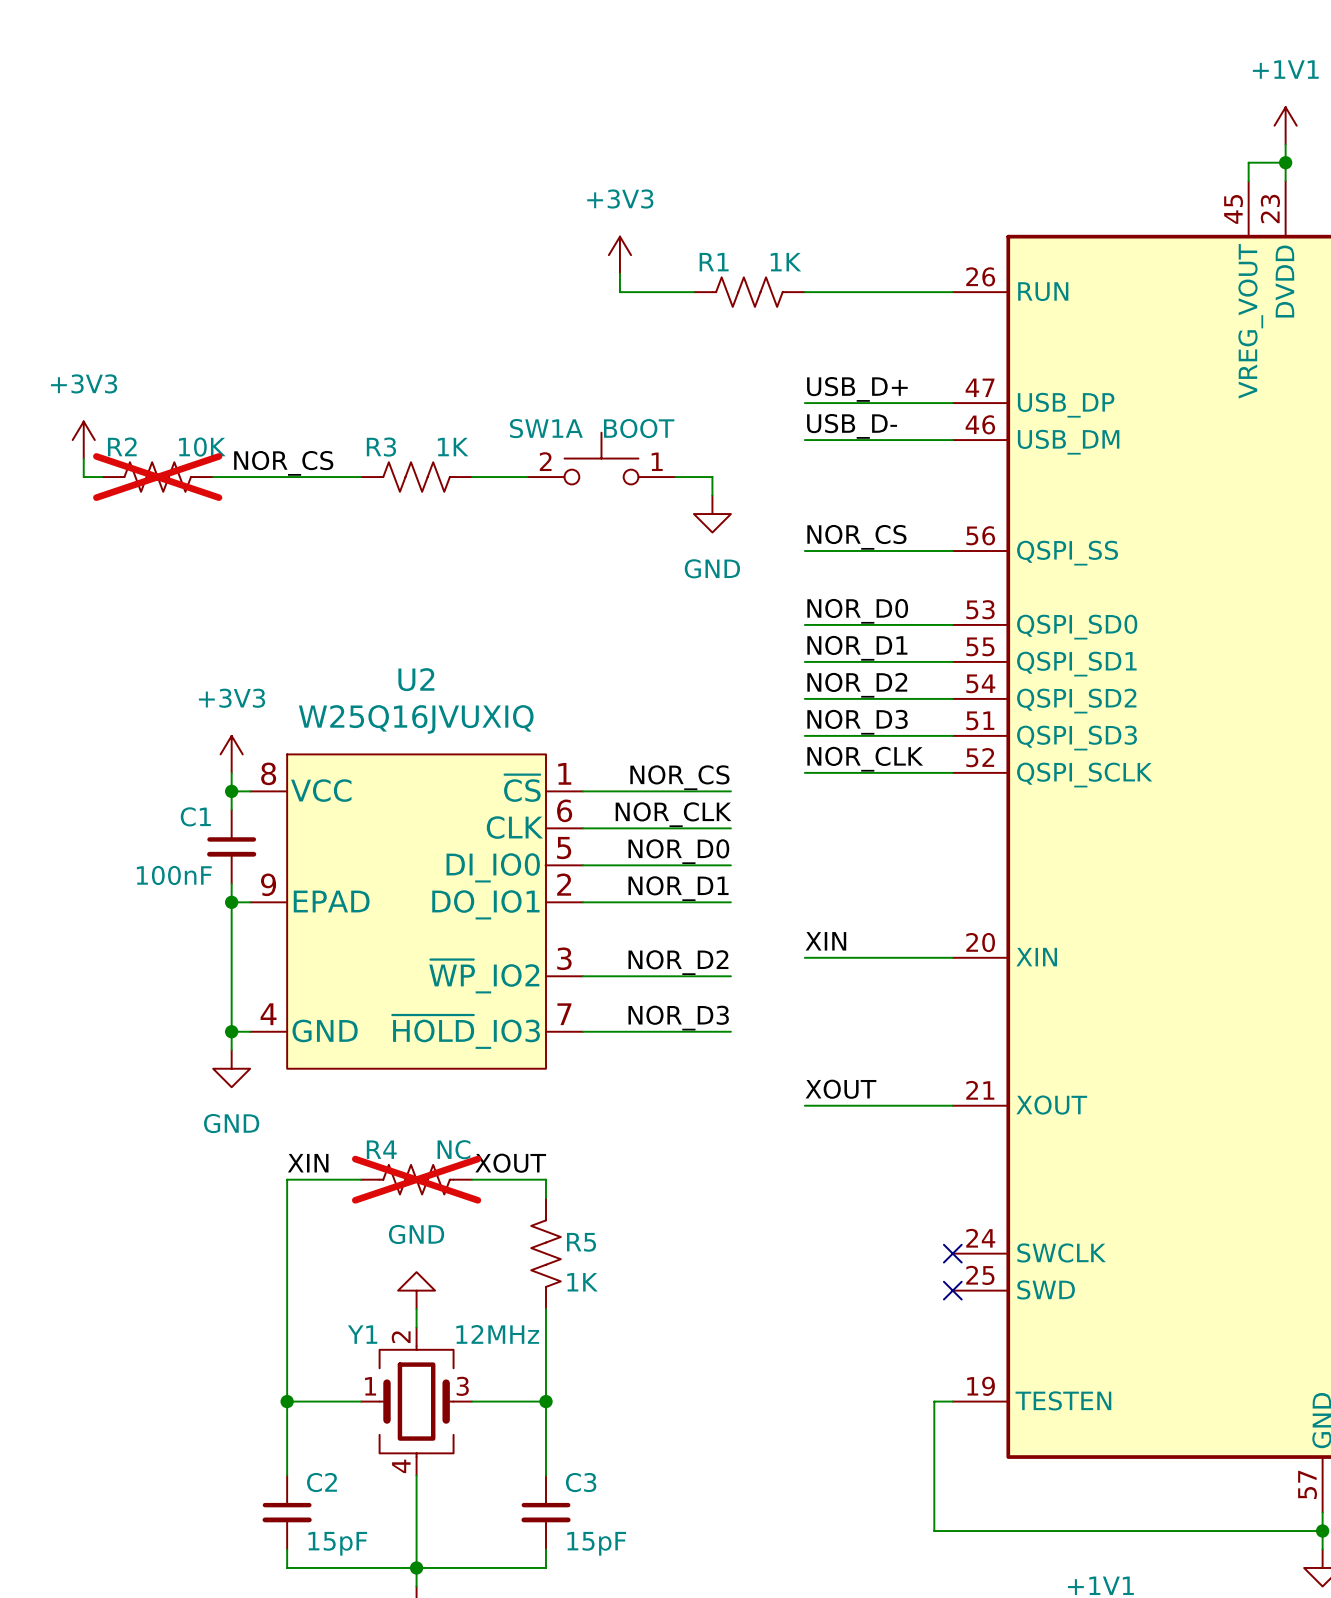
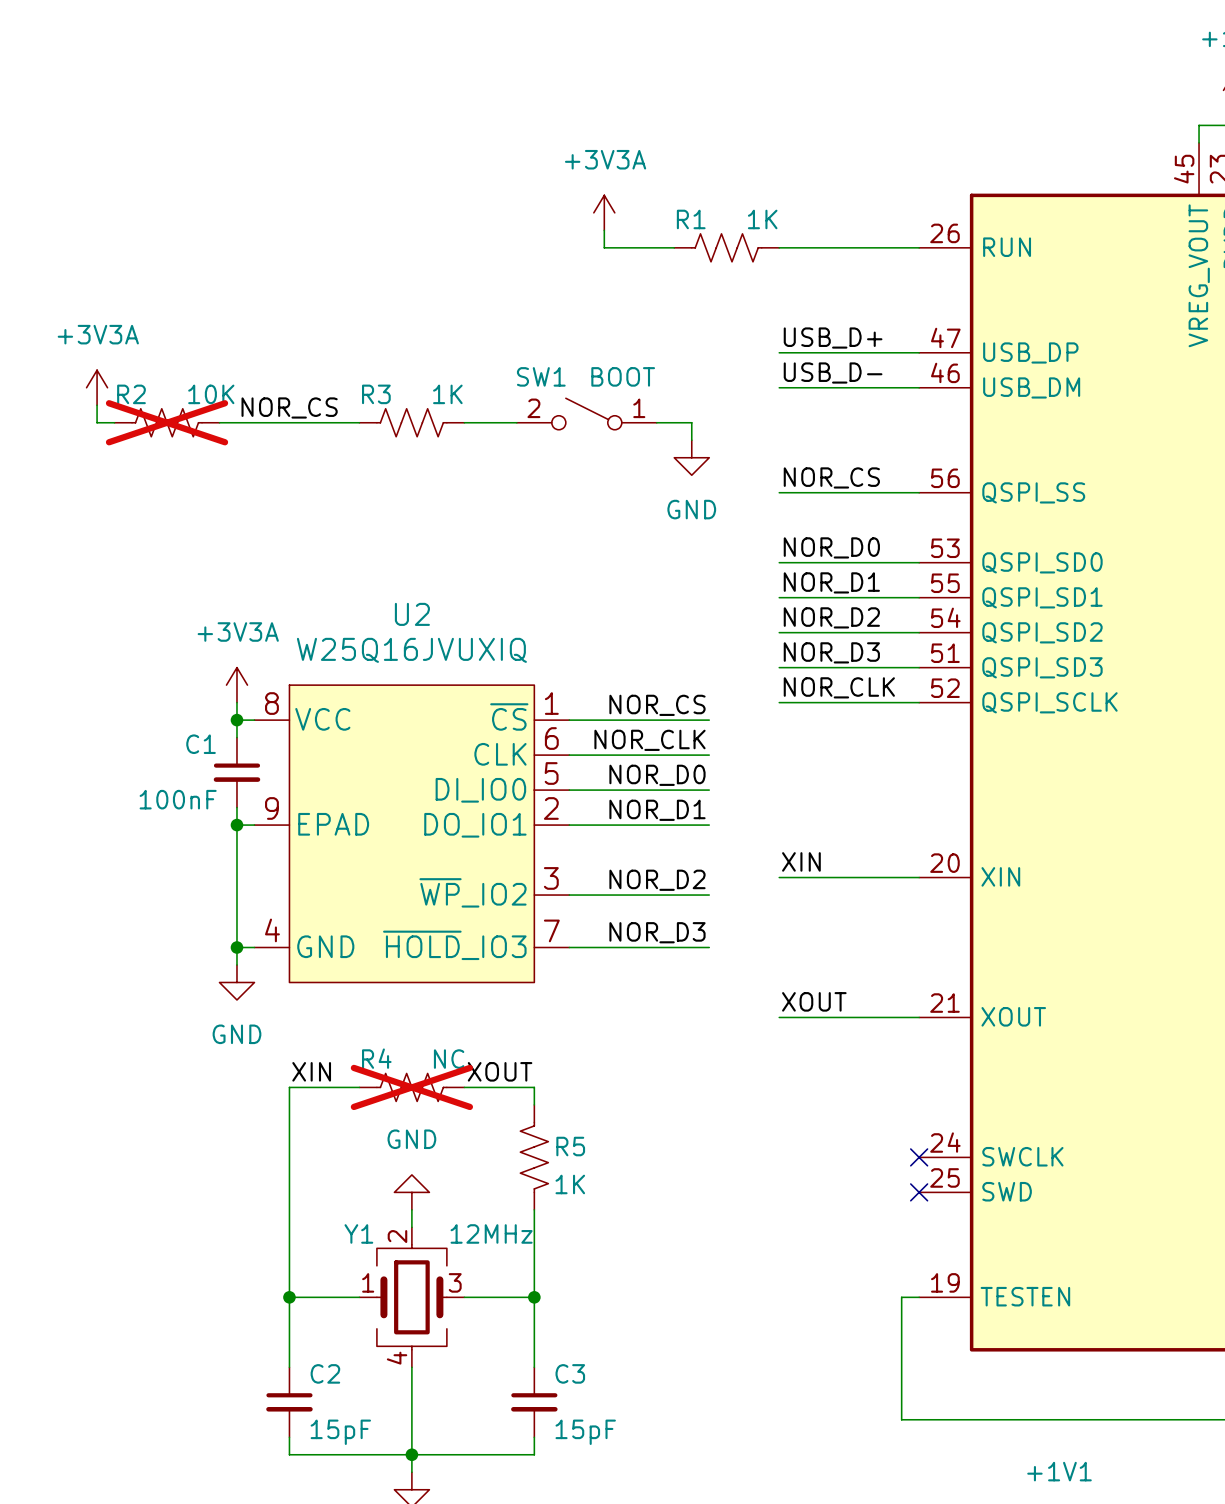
power symbol: +3V3 (619, 255) -> +3V3A (604, 212)
power symbol: +3V3 (83, 440) -> +3V3A (97, 387)
SW1A: BOOT (601, 458) -> none
SW1: none -> BOOT (586, 414)
power symbol: +3V3 (231, 754) -> +3V3A (236, 685)

